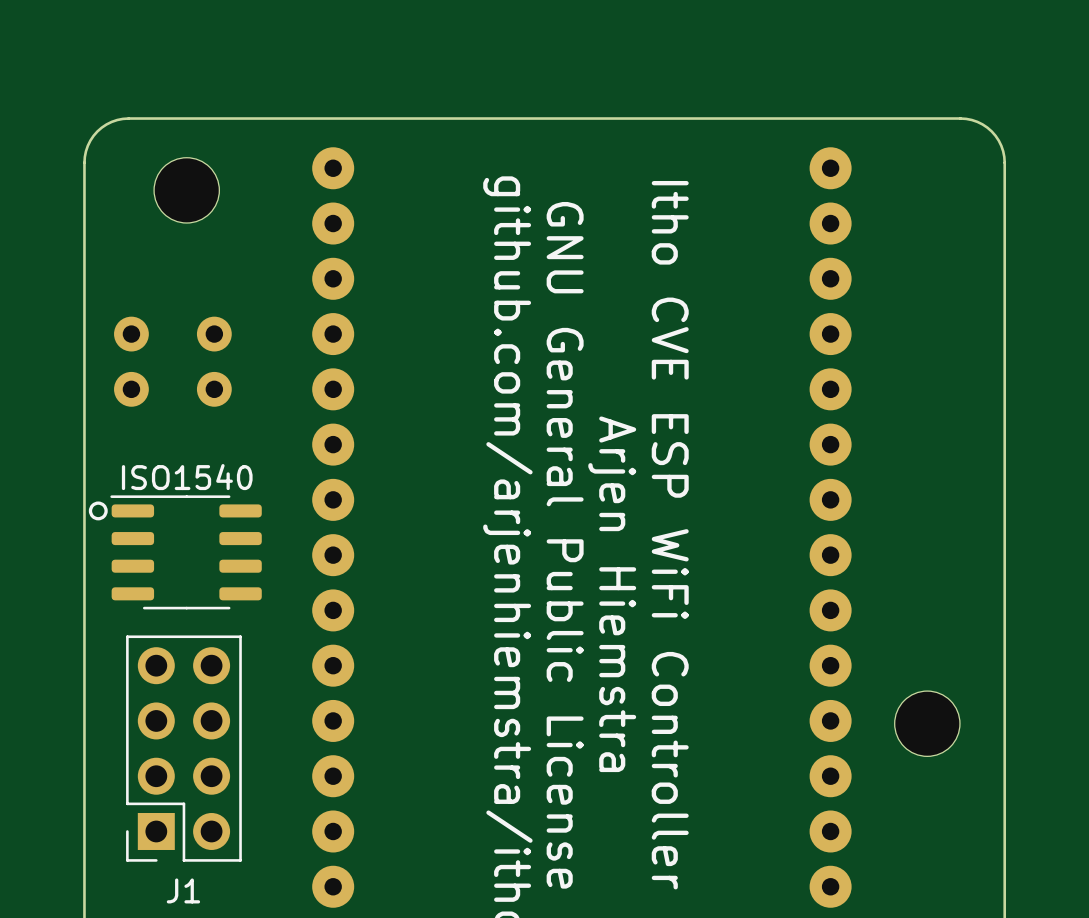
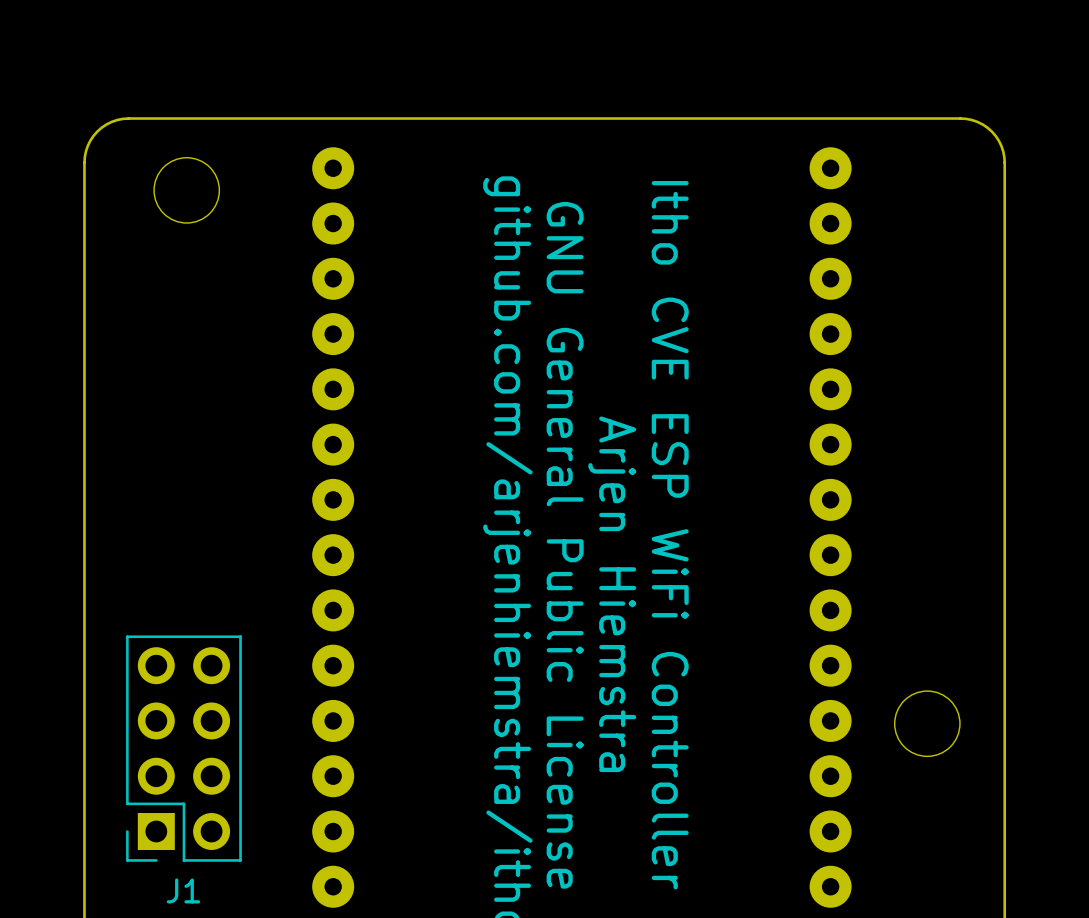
part: (131, 361) -> none
part: (214, 361) -> none
drawing: [88, 501, 108, 521] -> none
ISO1540: (186, 552) -> none

